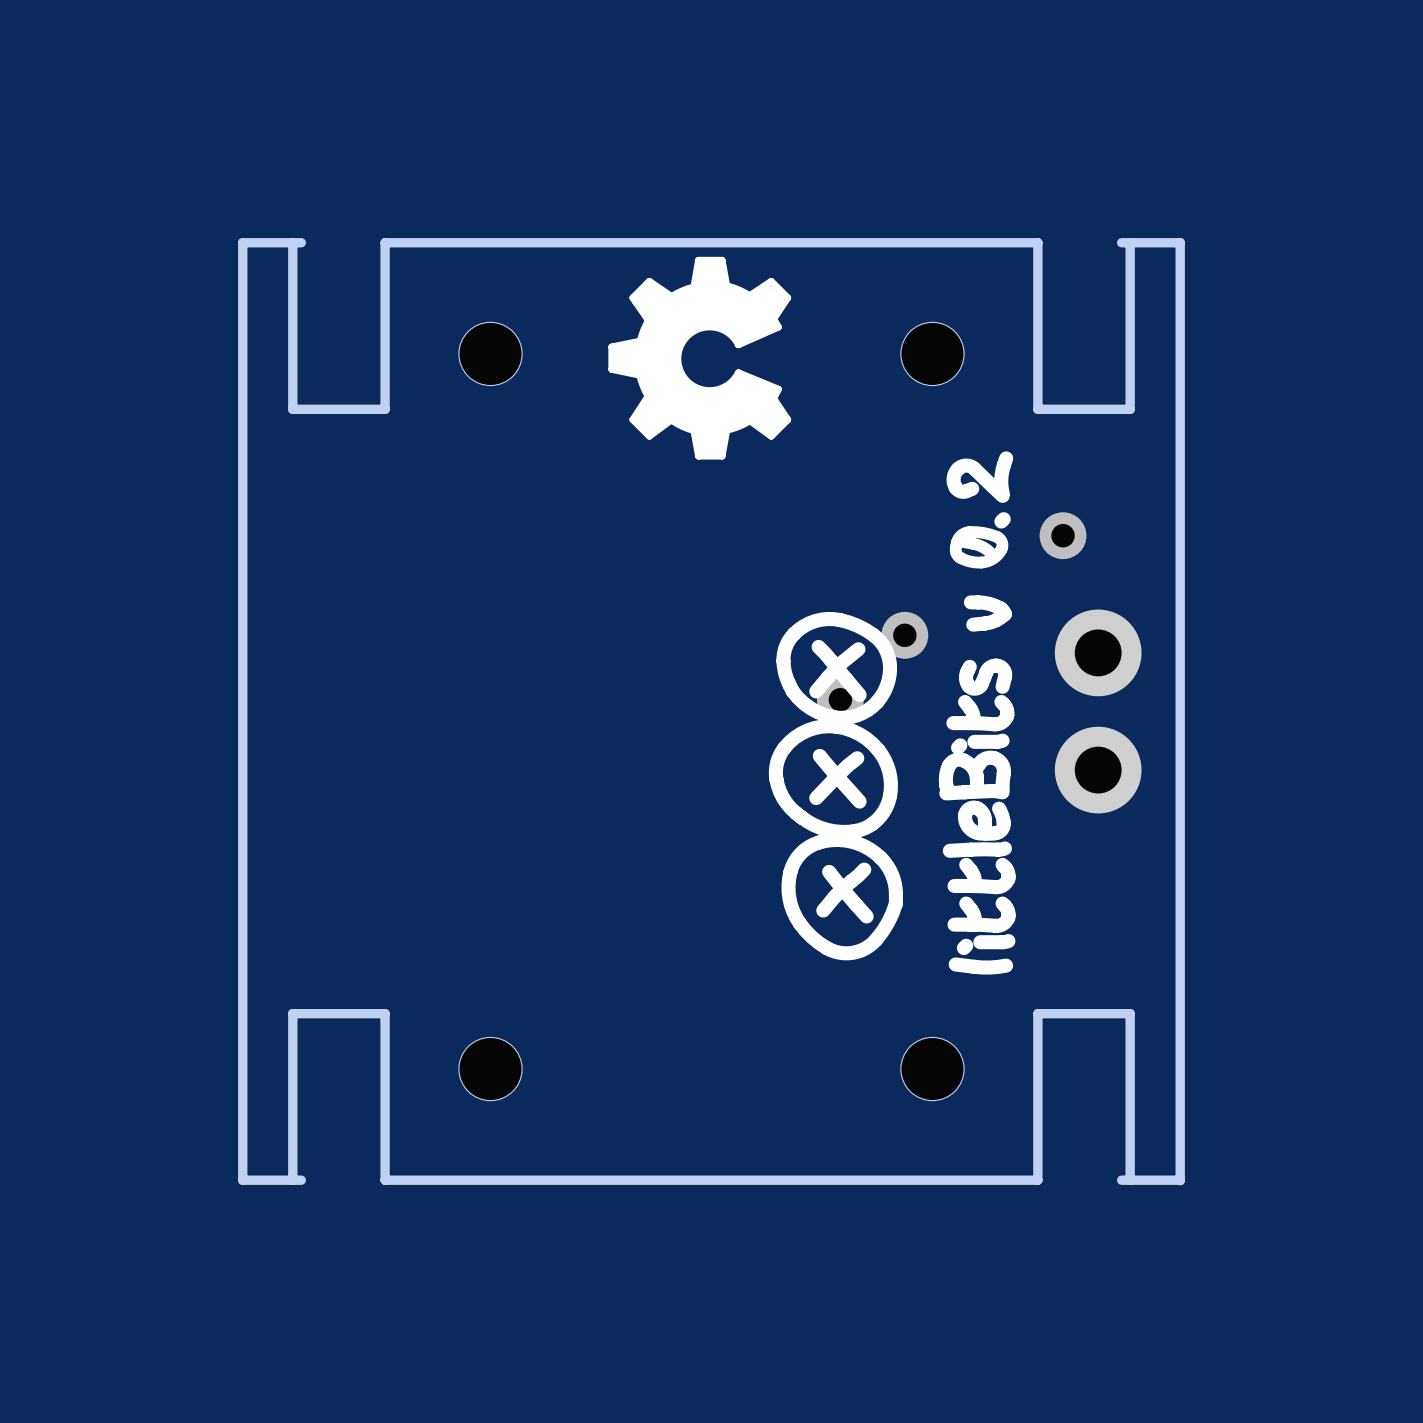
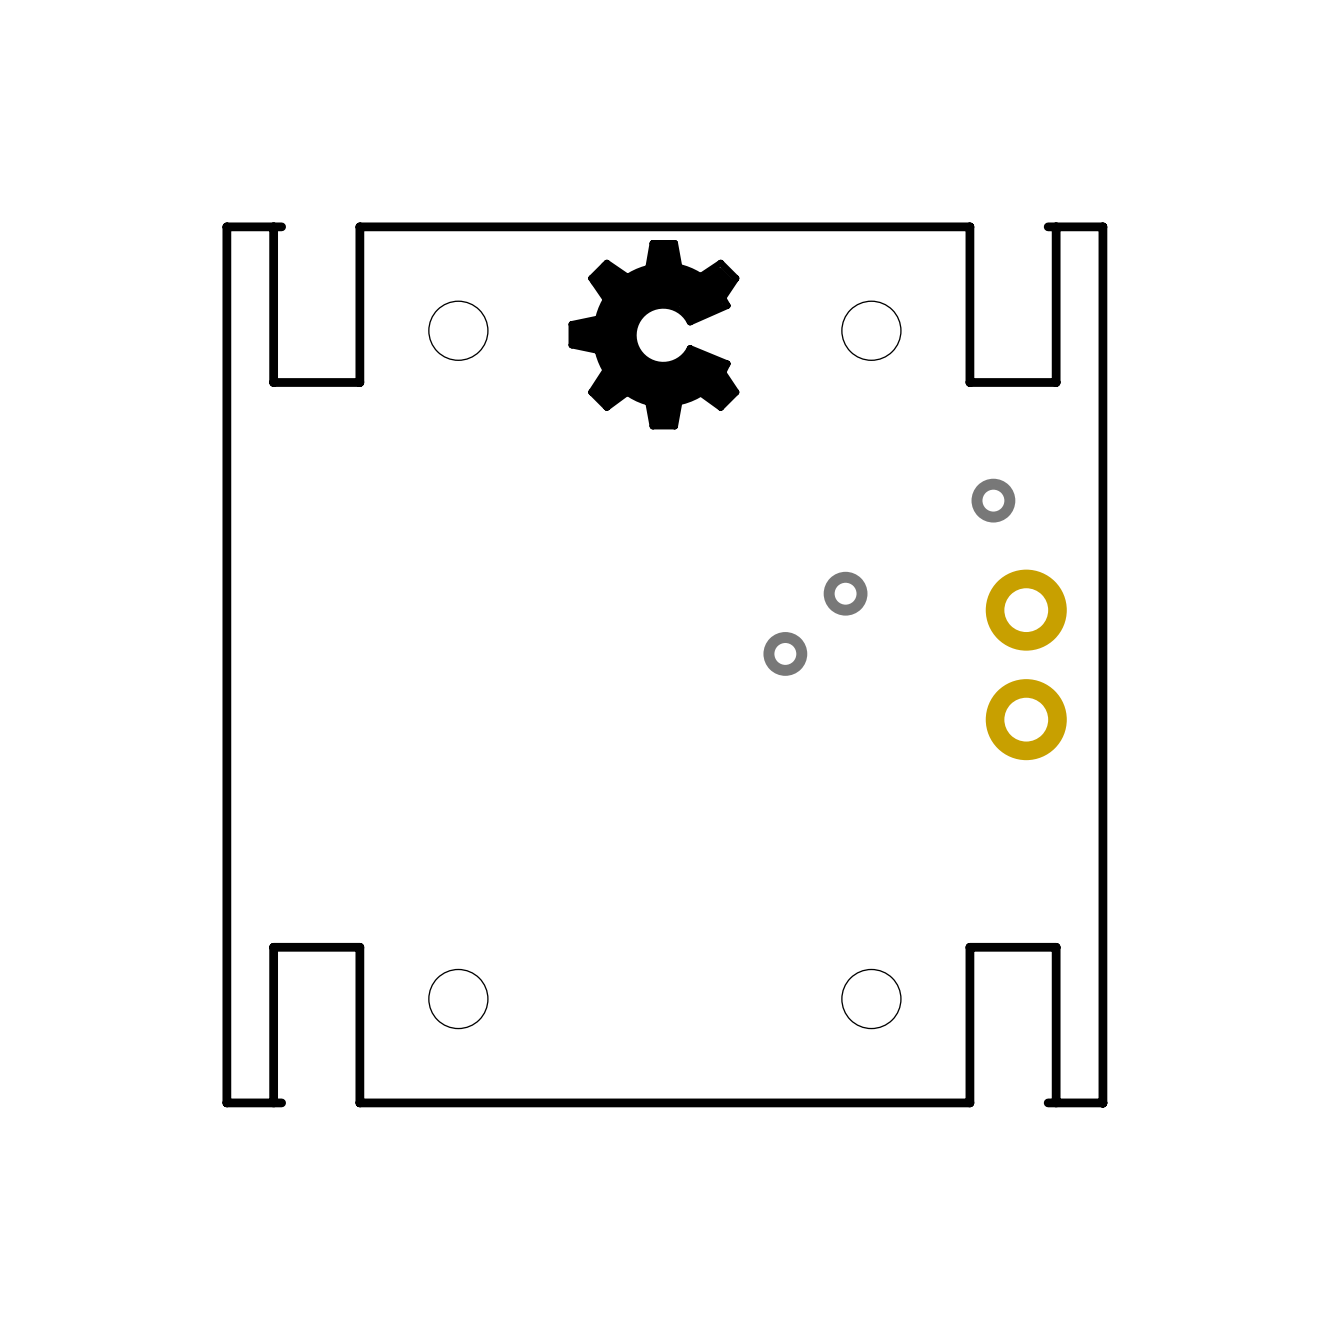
drawing: [768, 451, 1016, 975] -> none

